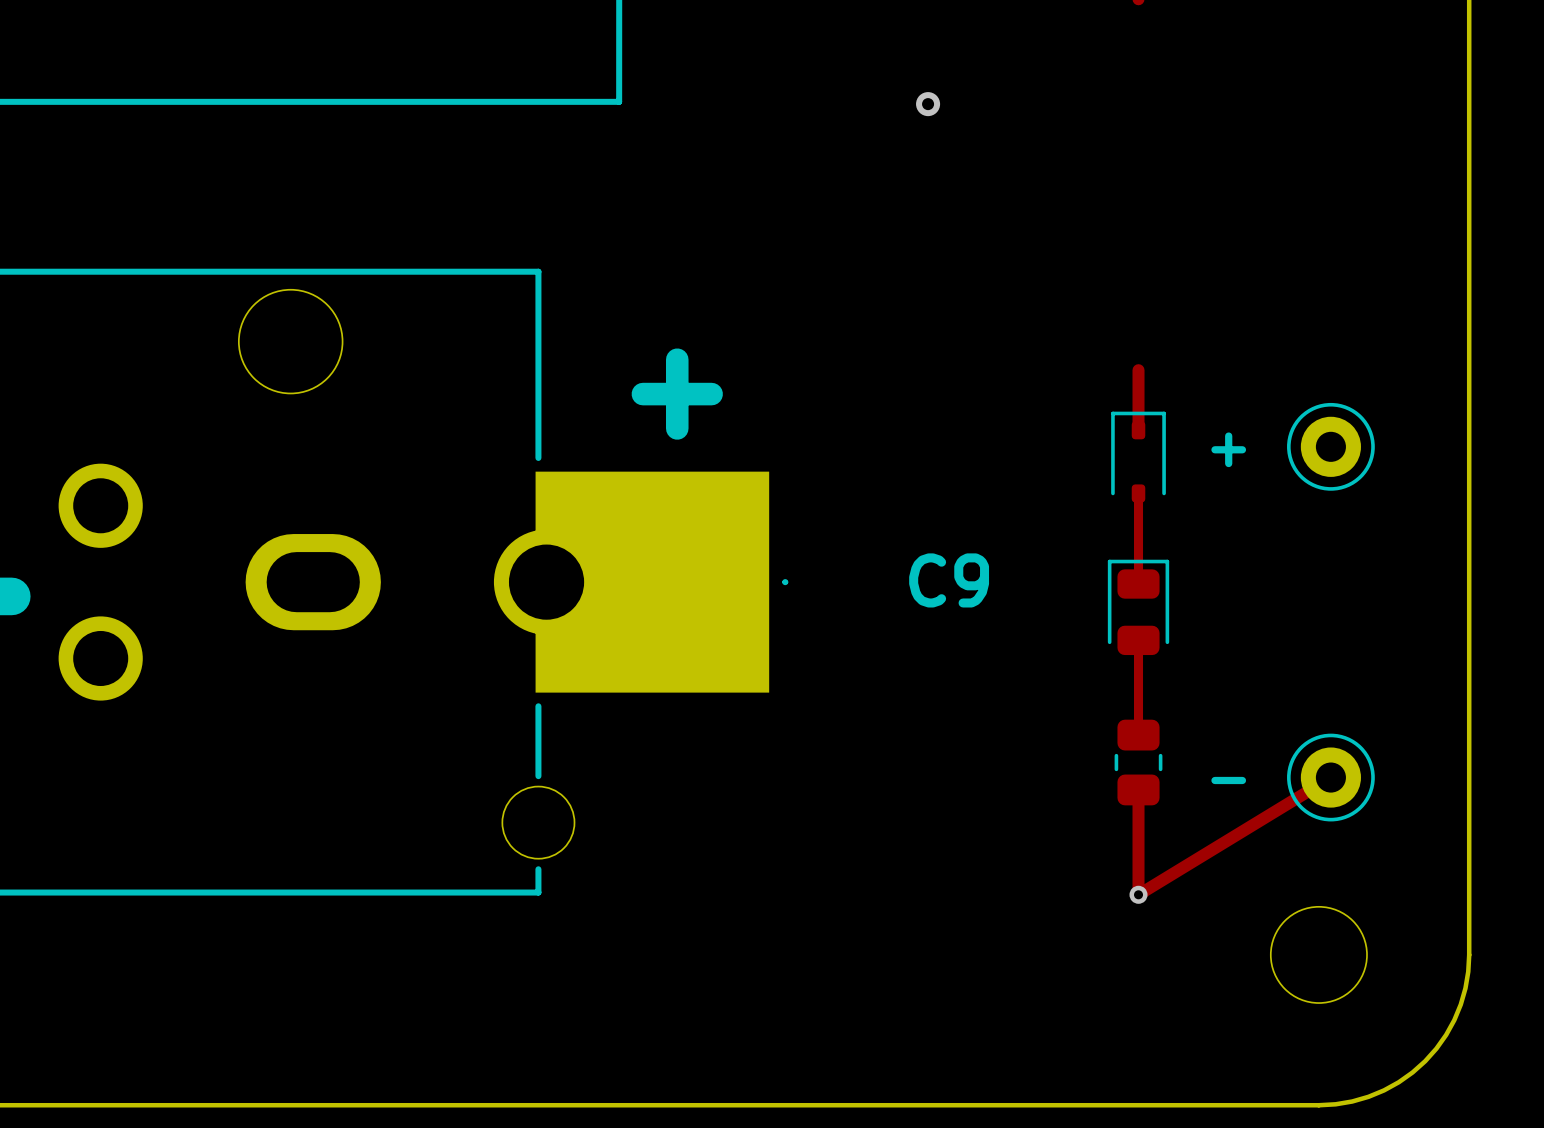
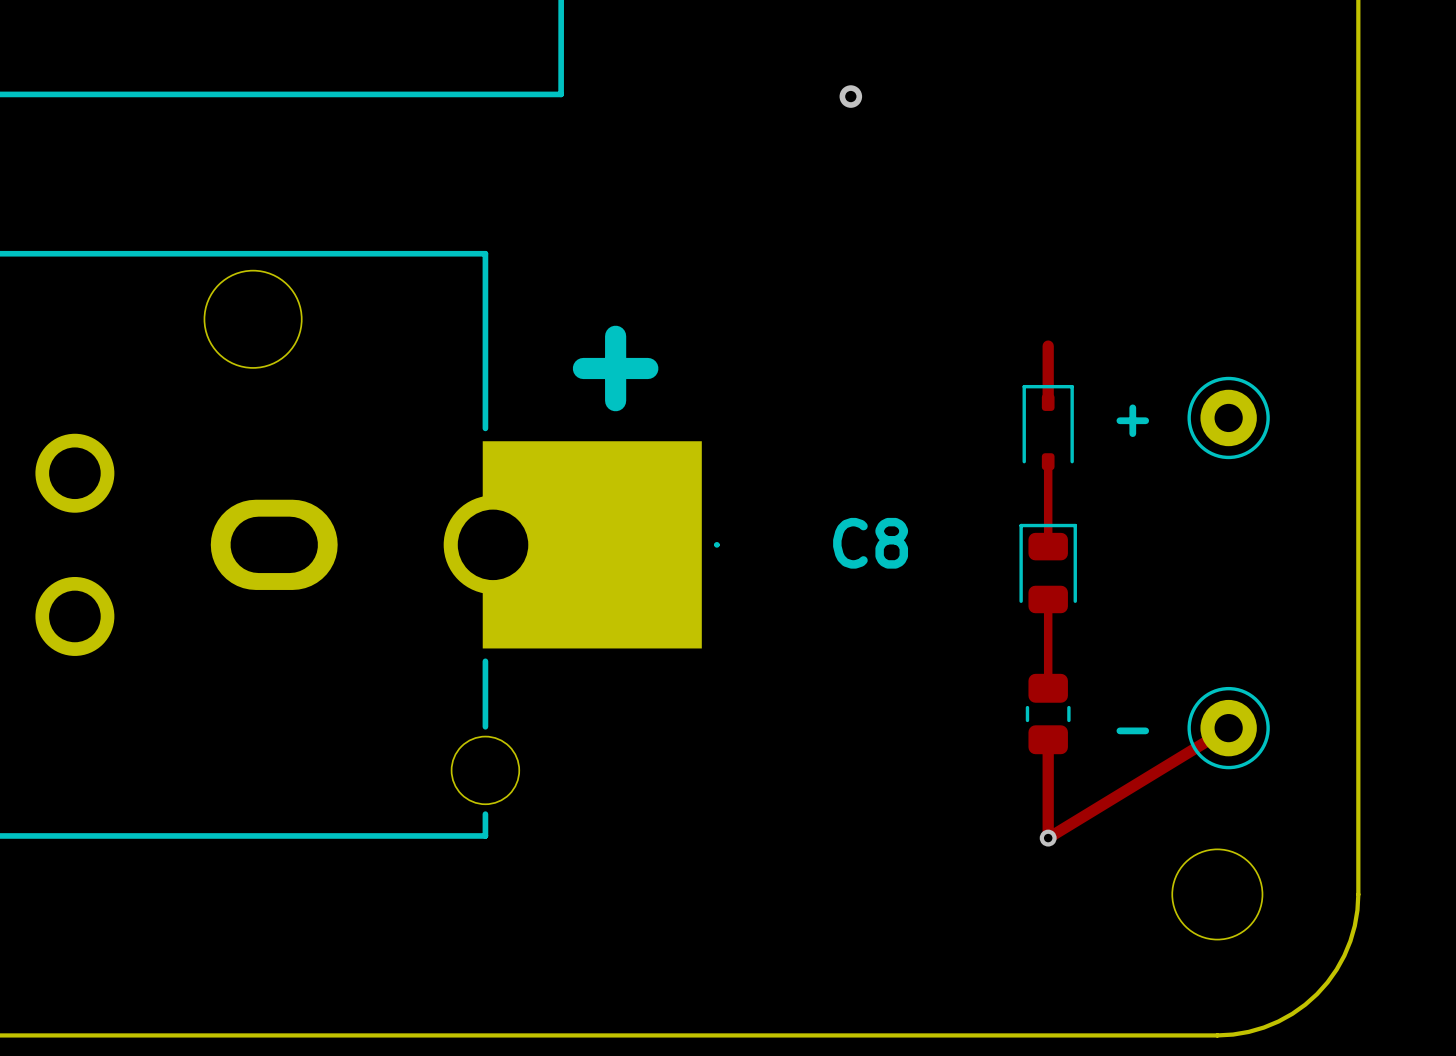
text: C9 (949, 580) -> C8 (870, 543)

